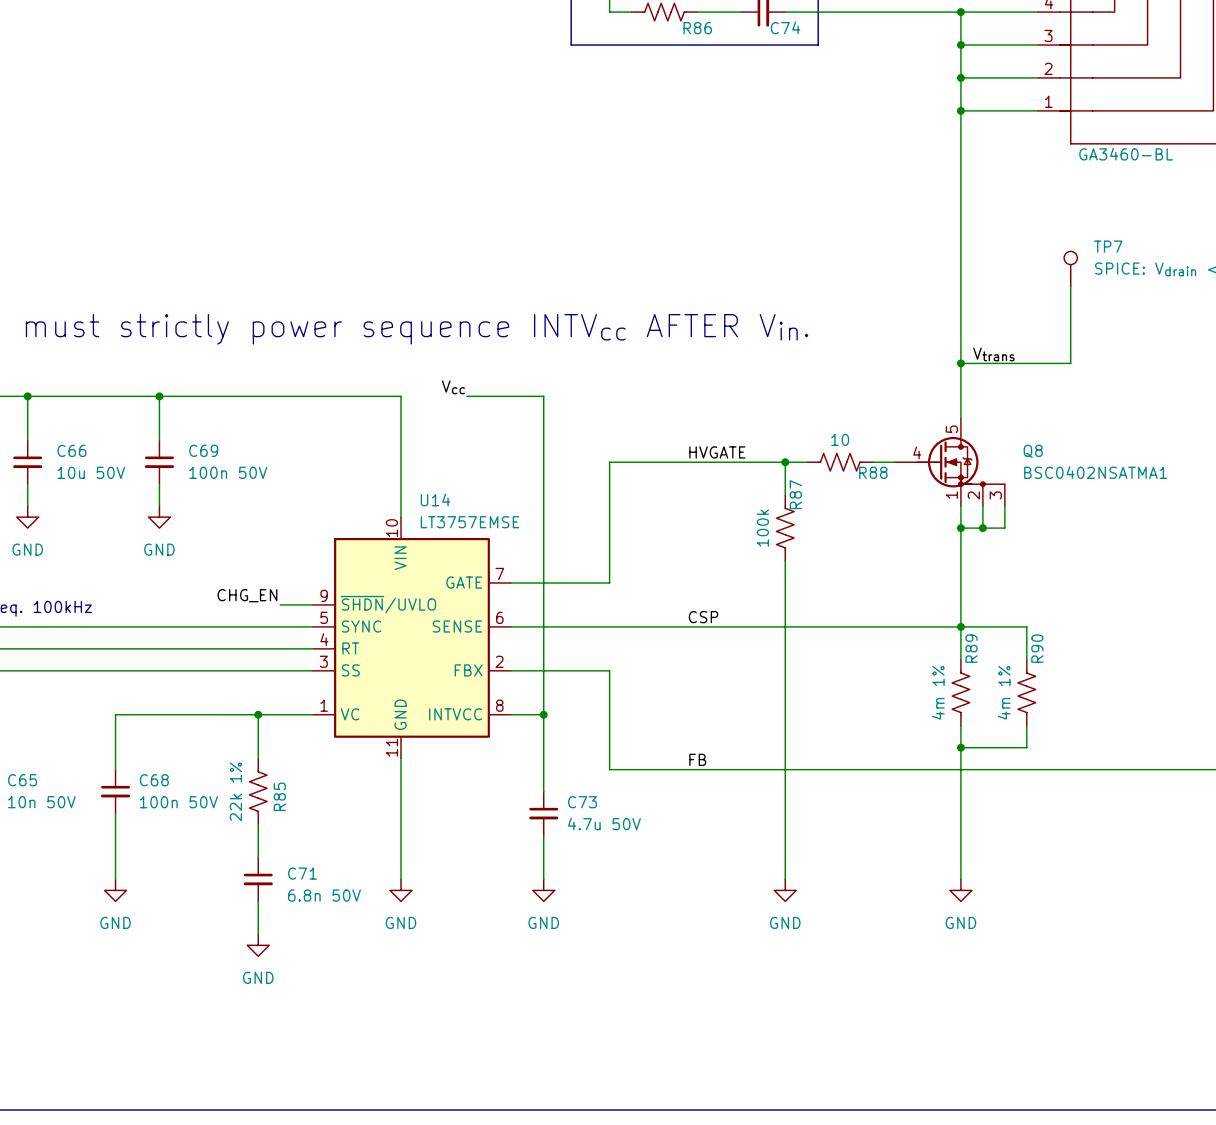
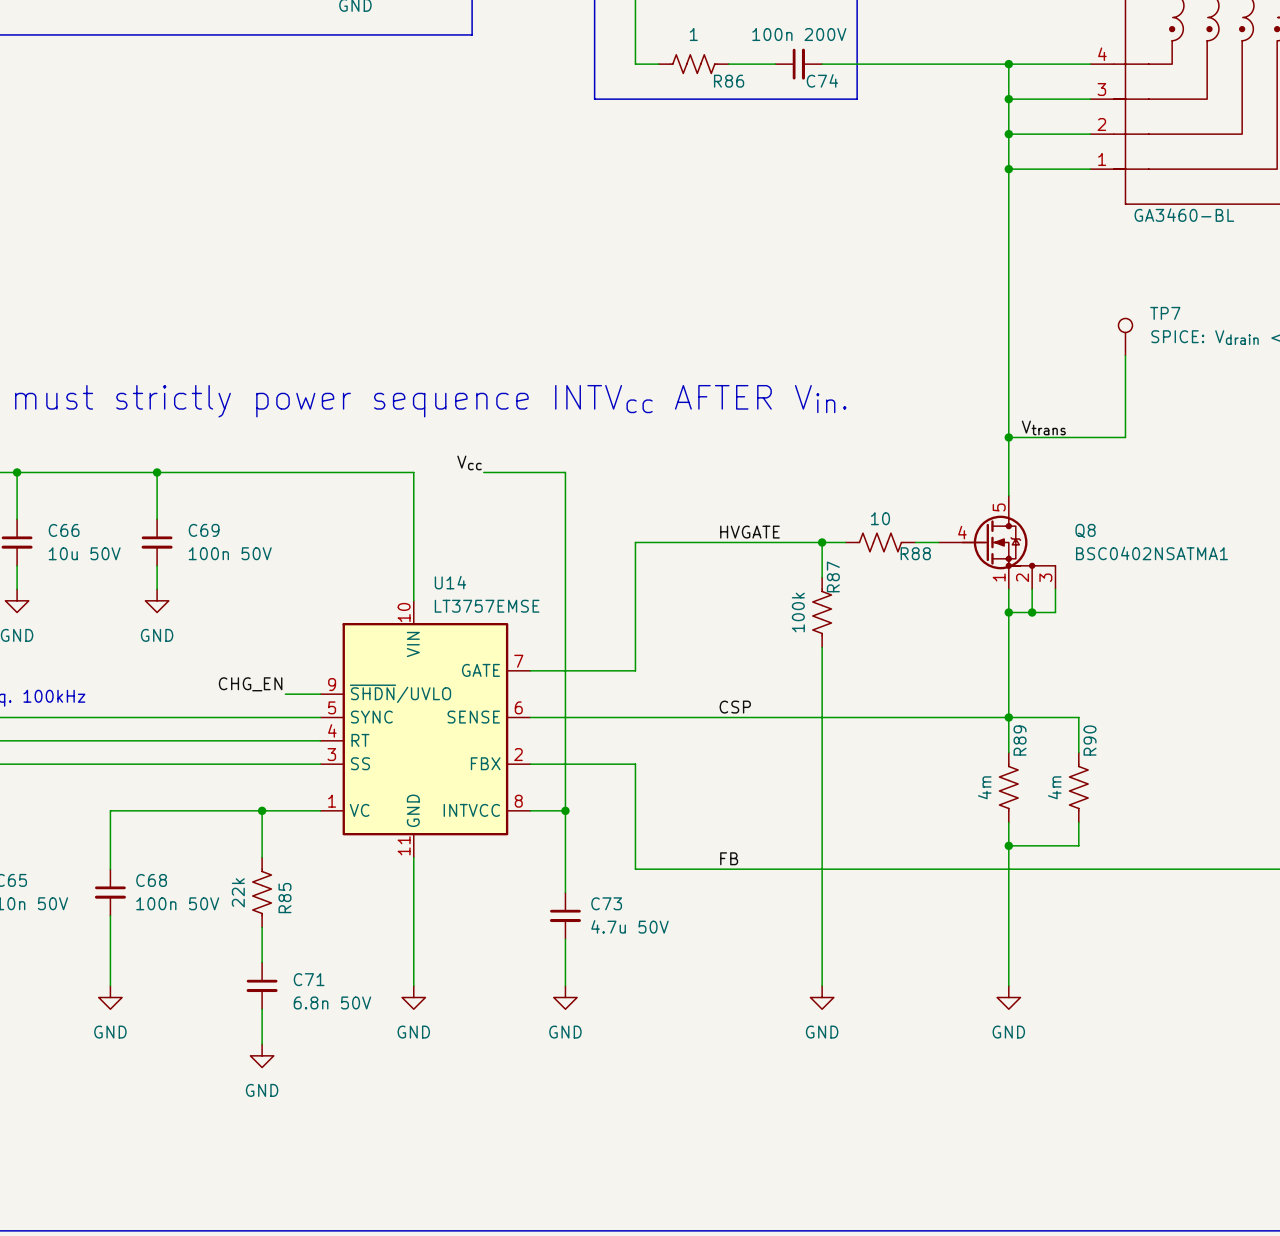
R89 value: 4m 1% (938, 692) -> 4m (984, 787)
R90 value: 4m 1% (1004, 692) -> 4m (1054, 787)
R85 value: 22k 1% (235, 791) -> 22k (238, 892)

